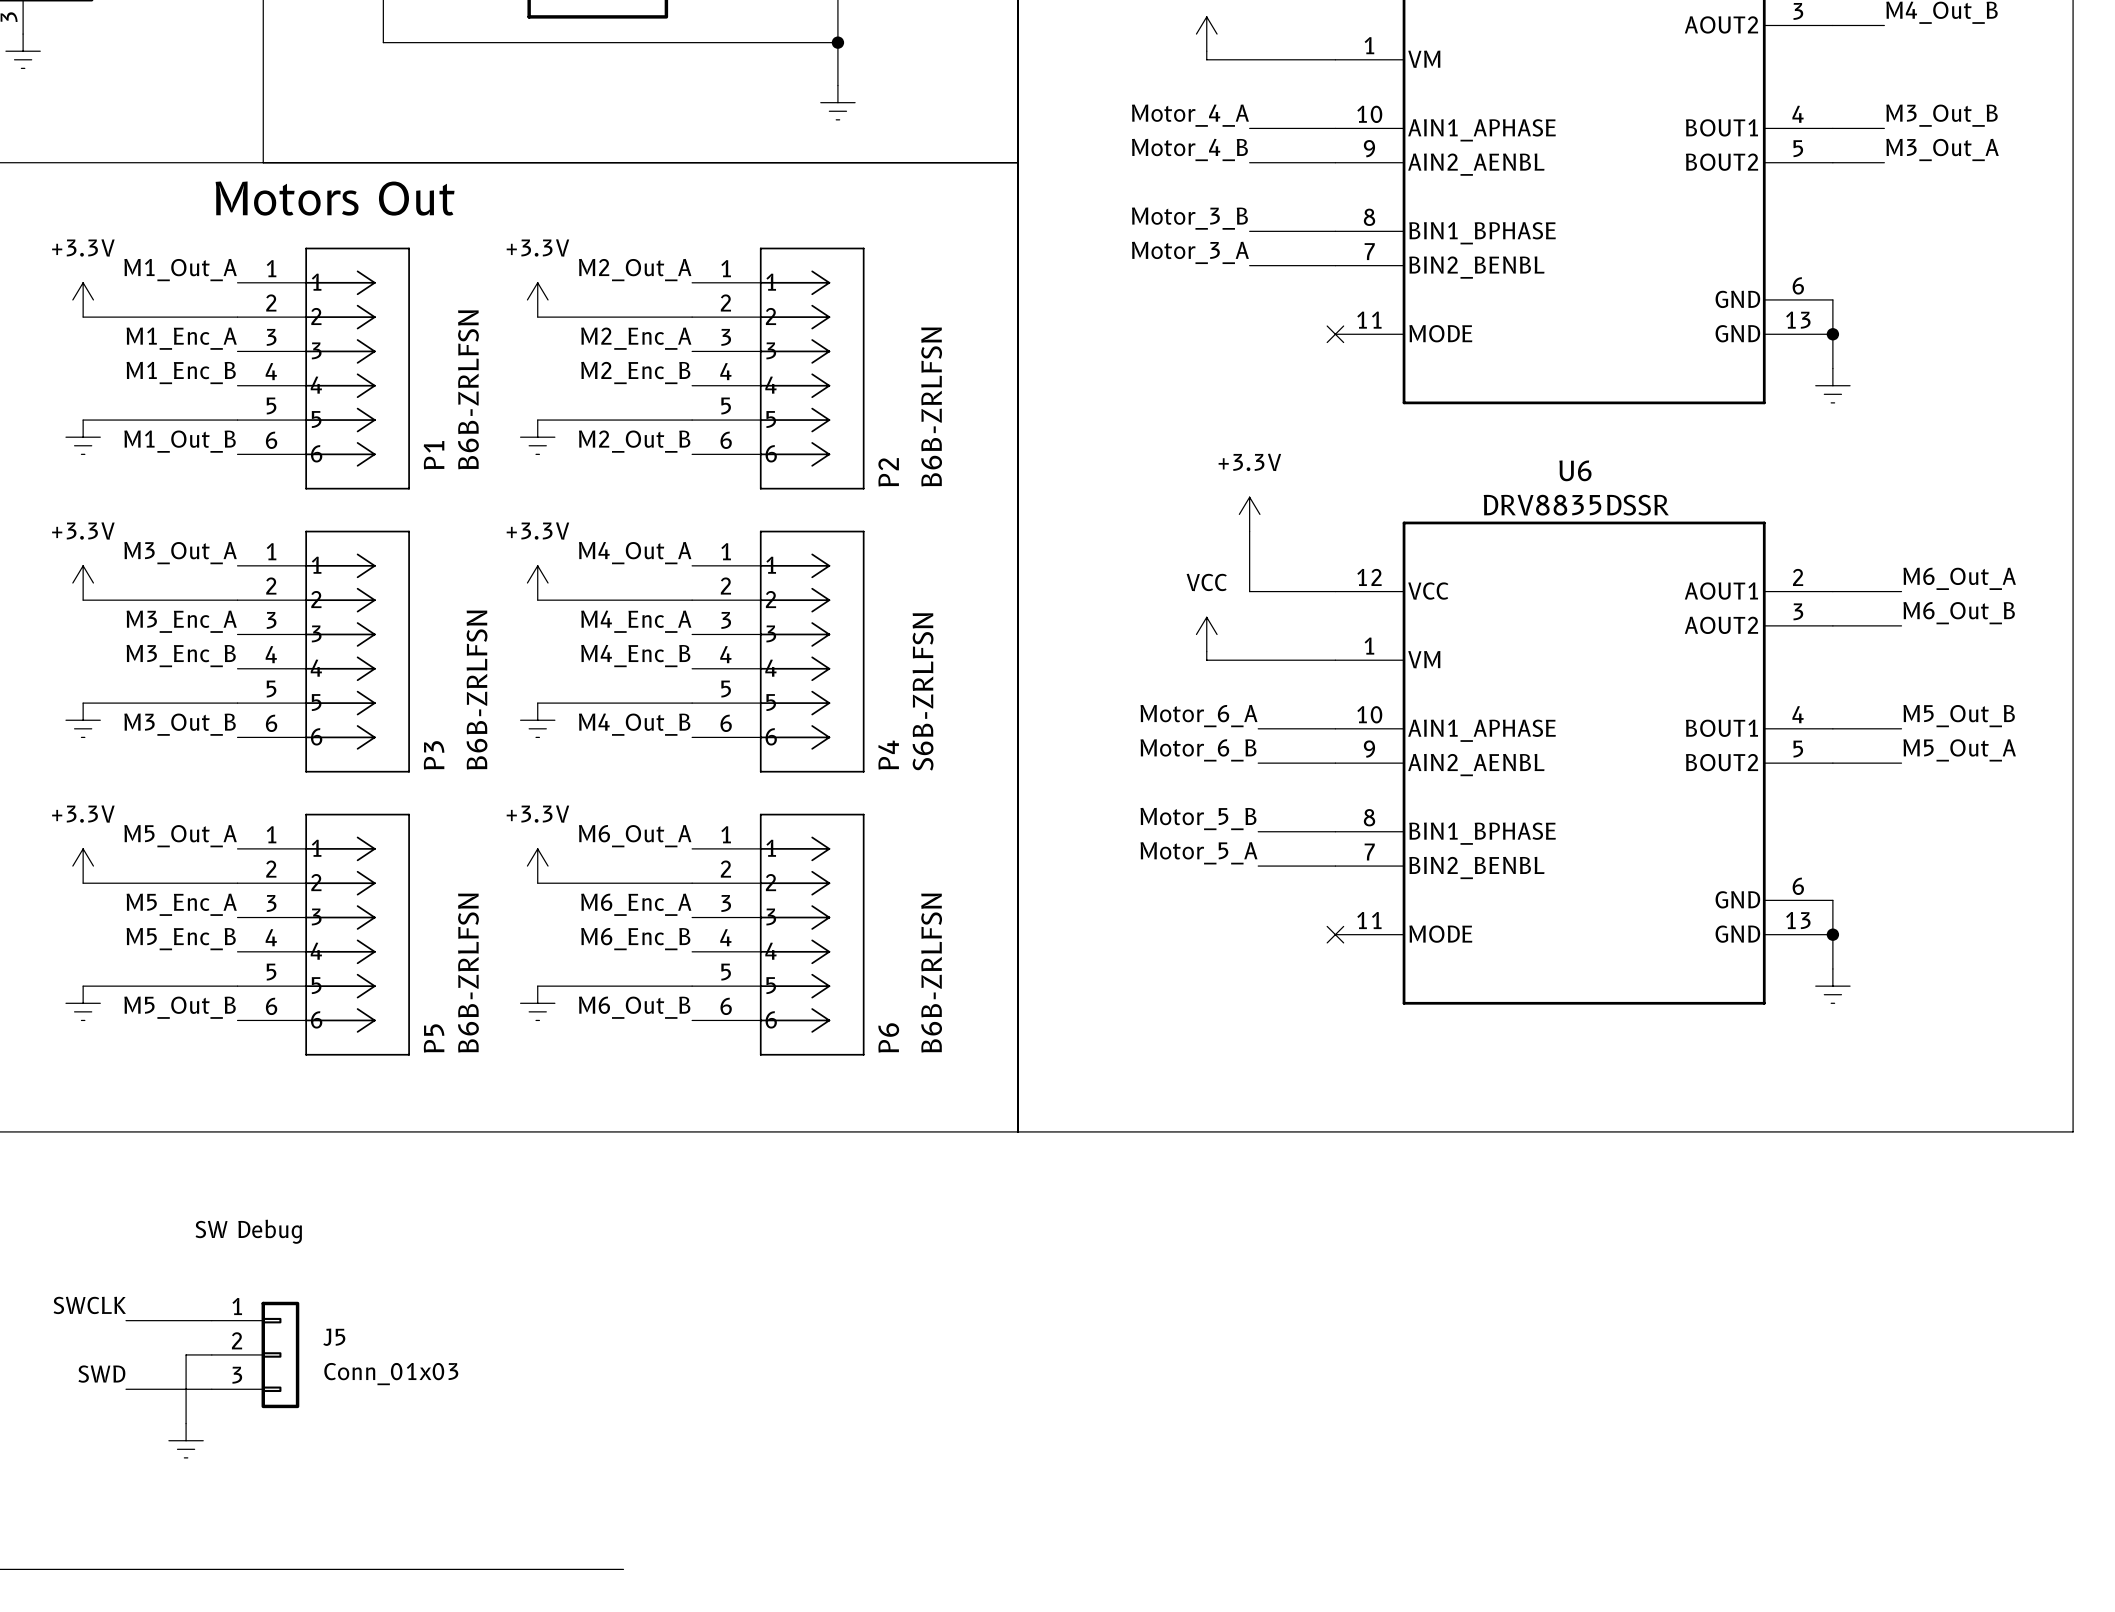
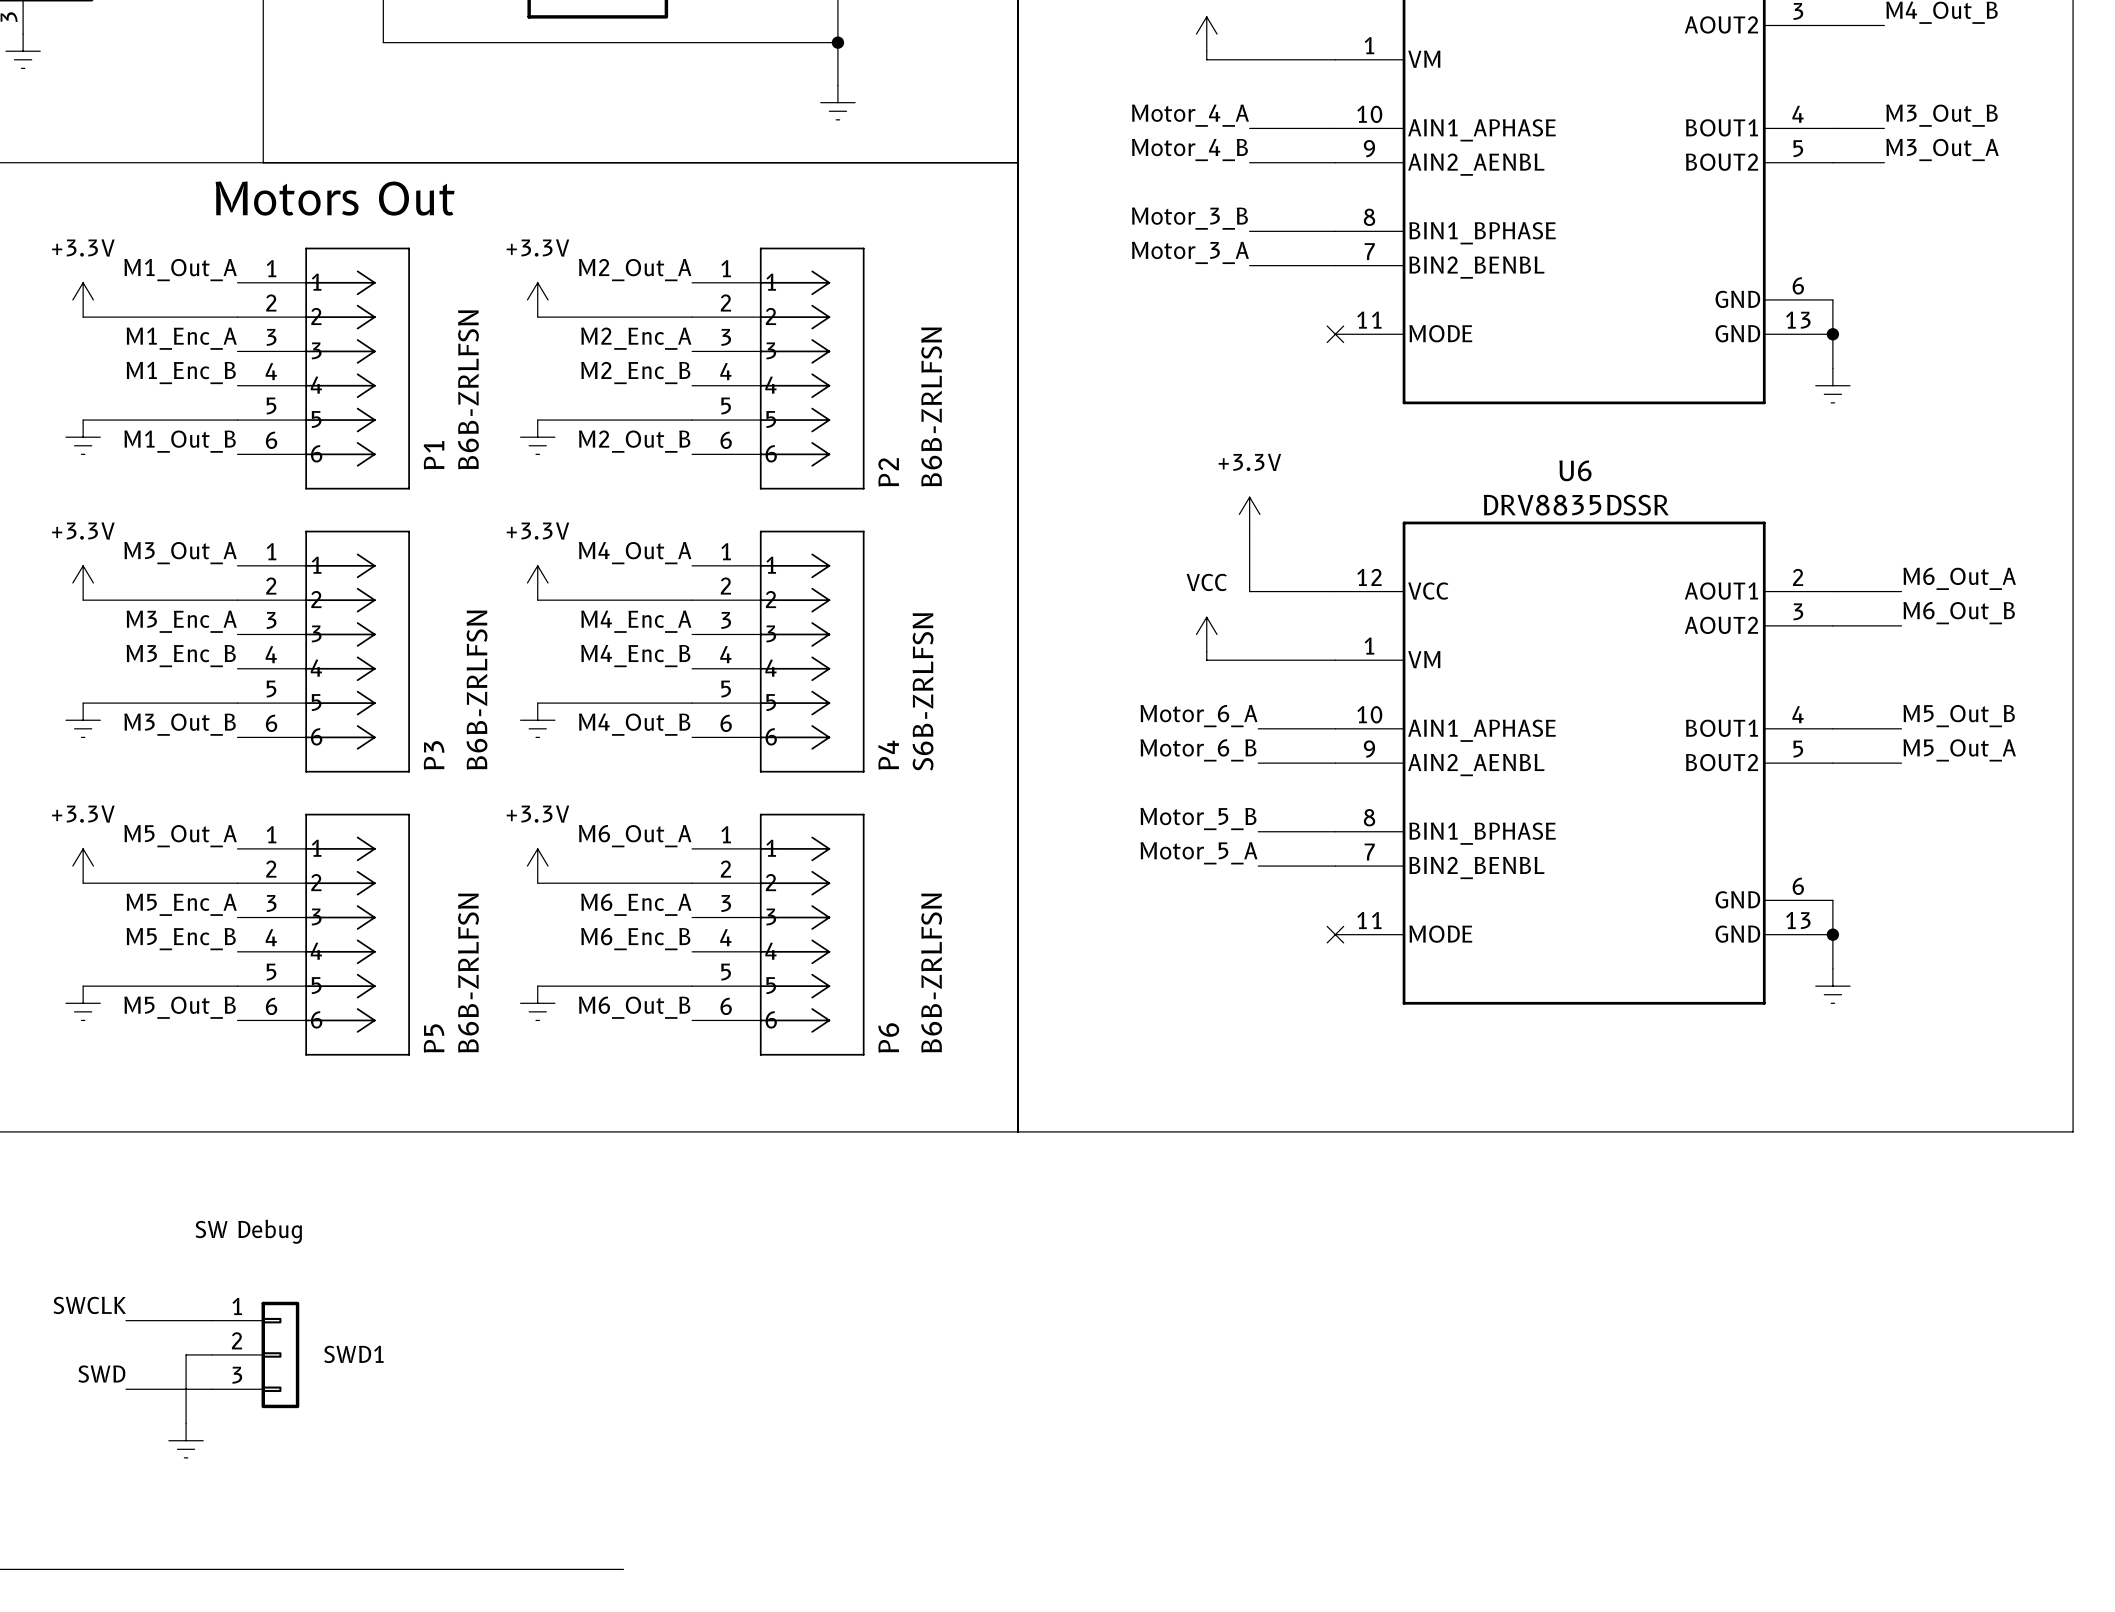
J5 name: J5 (334, 1337) -> SWD1 (353, 1354)
J5 value: Conn_01x03 (391, 1374) -> none

